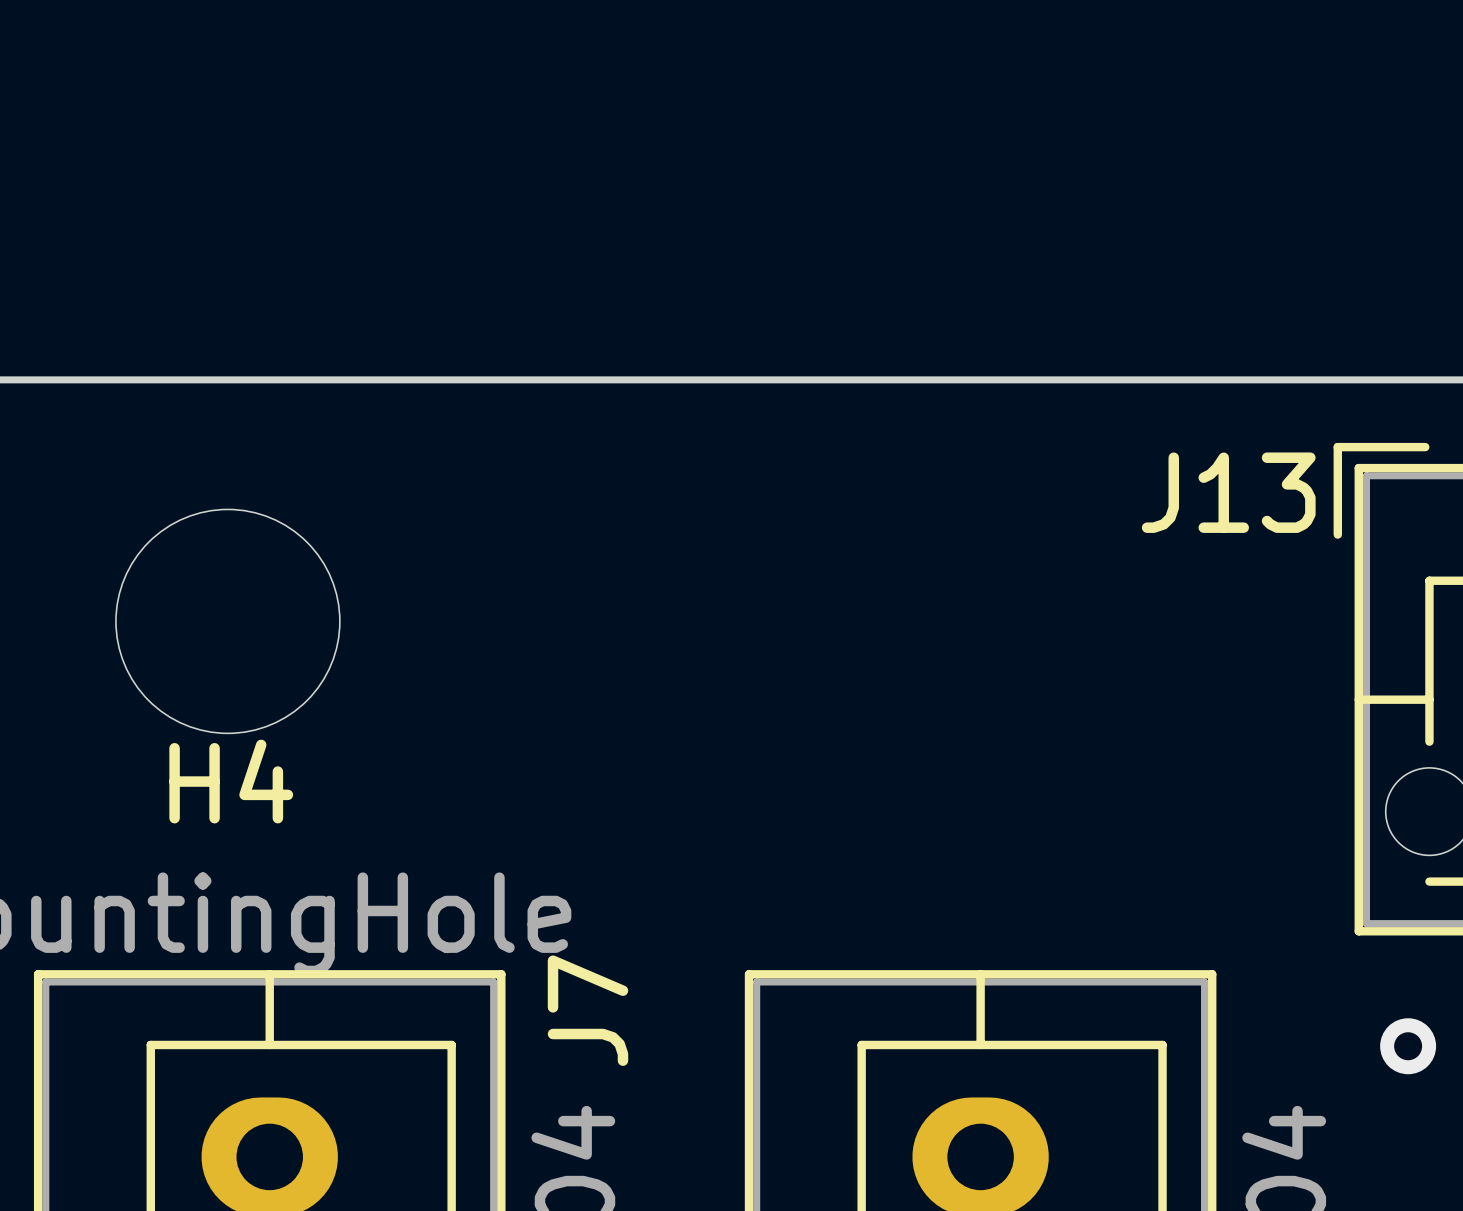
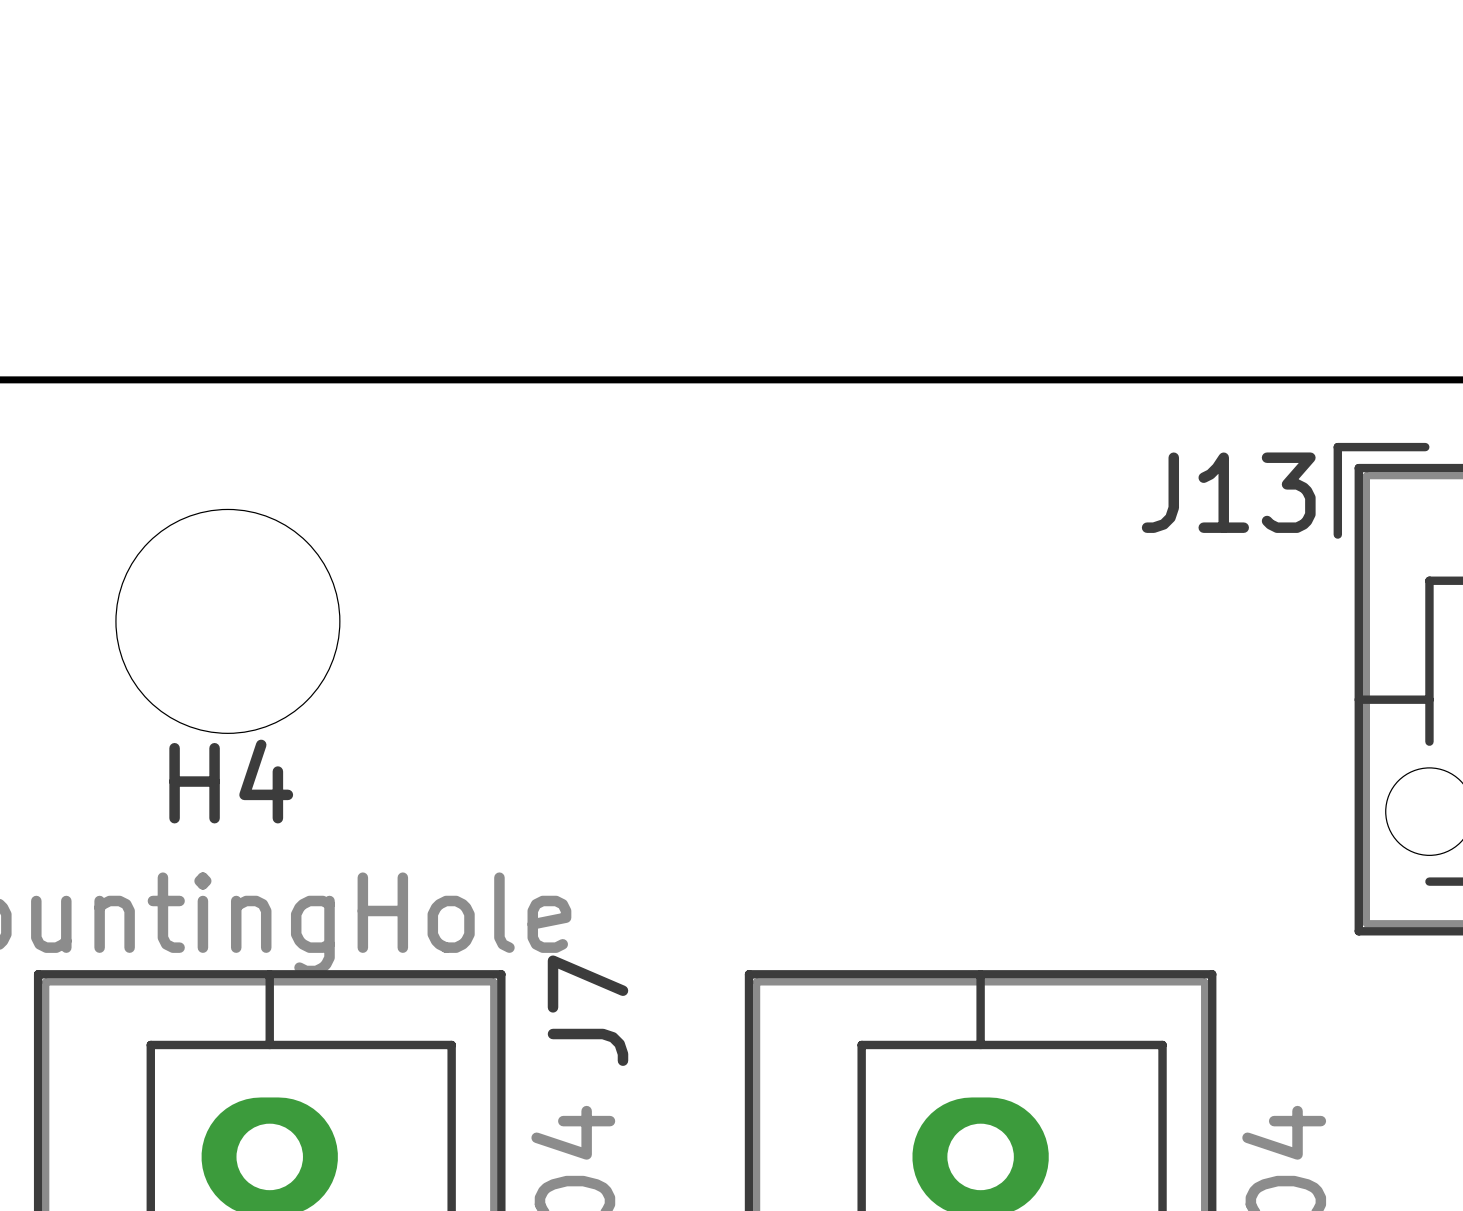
via: (1408, 1046) -> none

